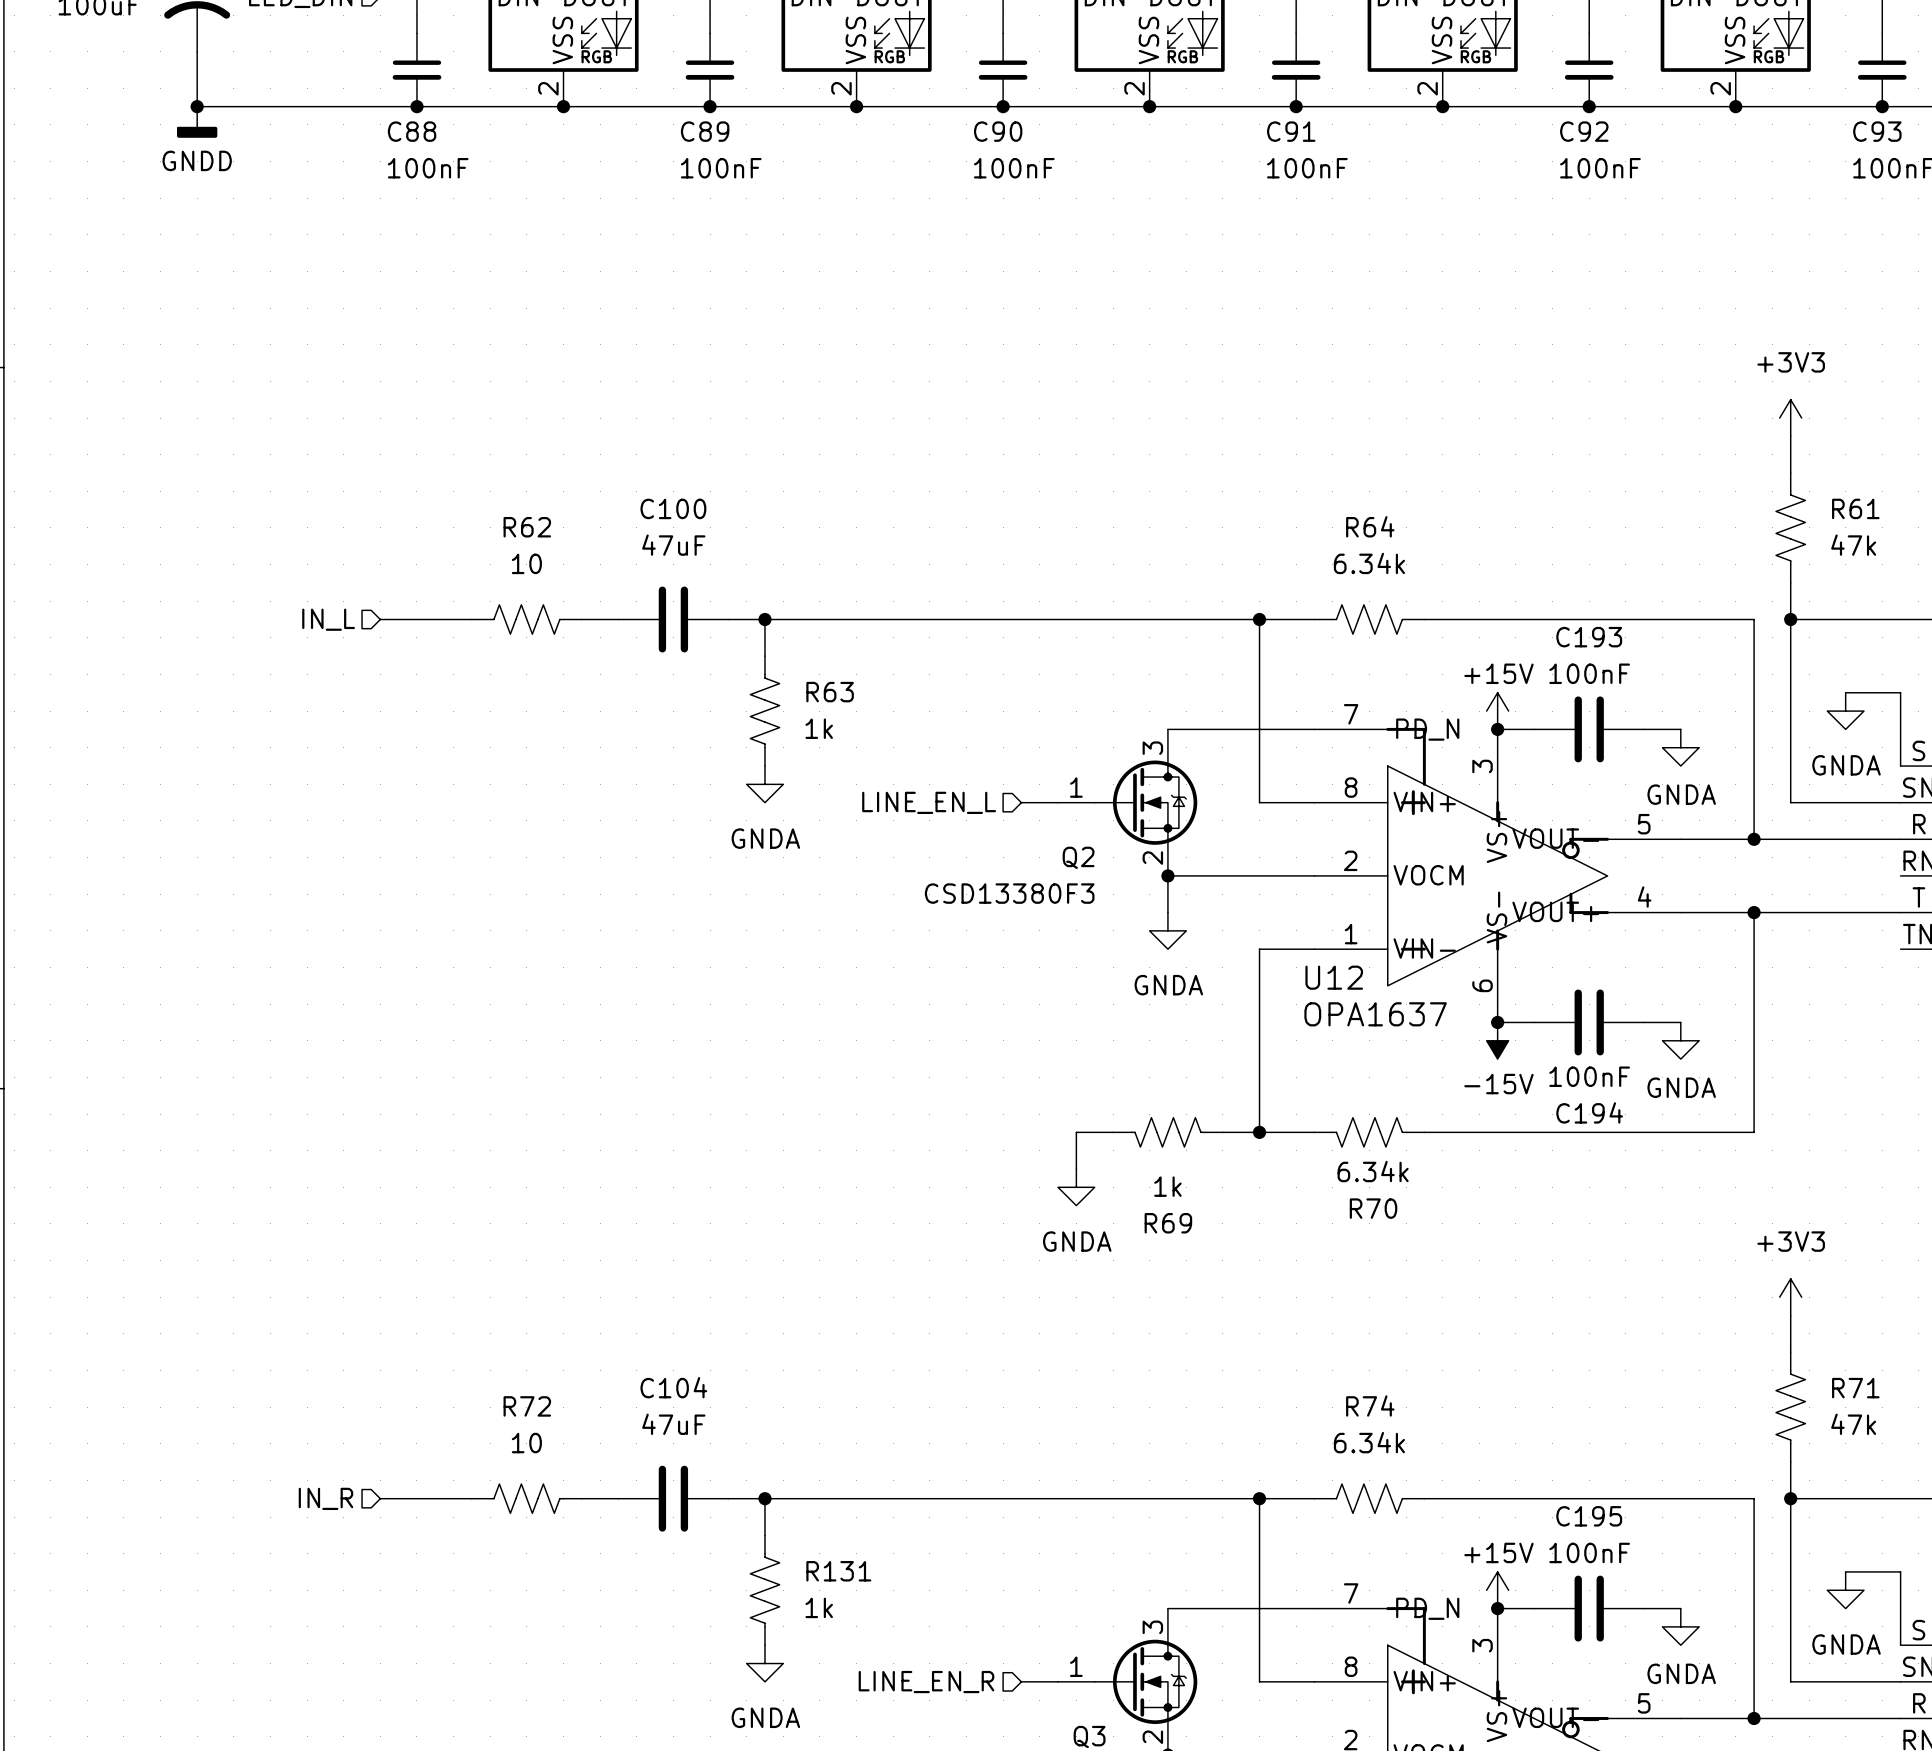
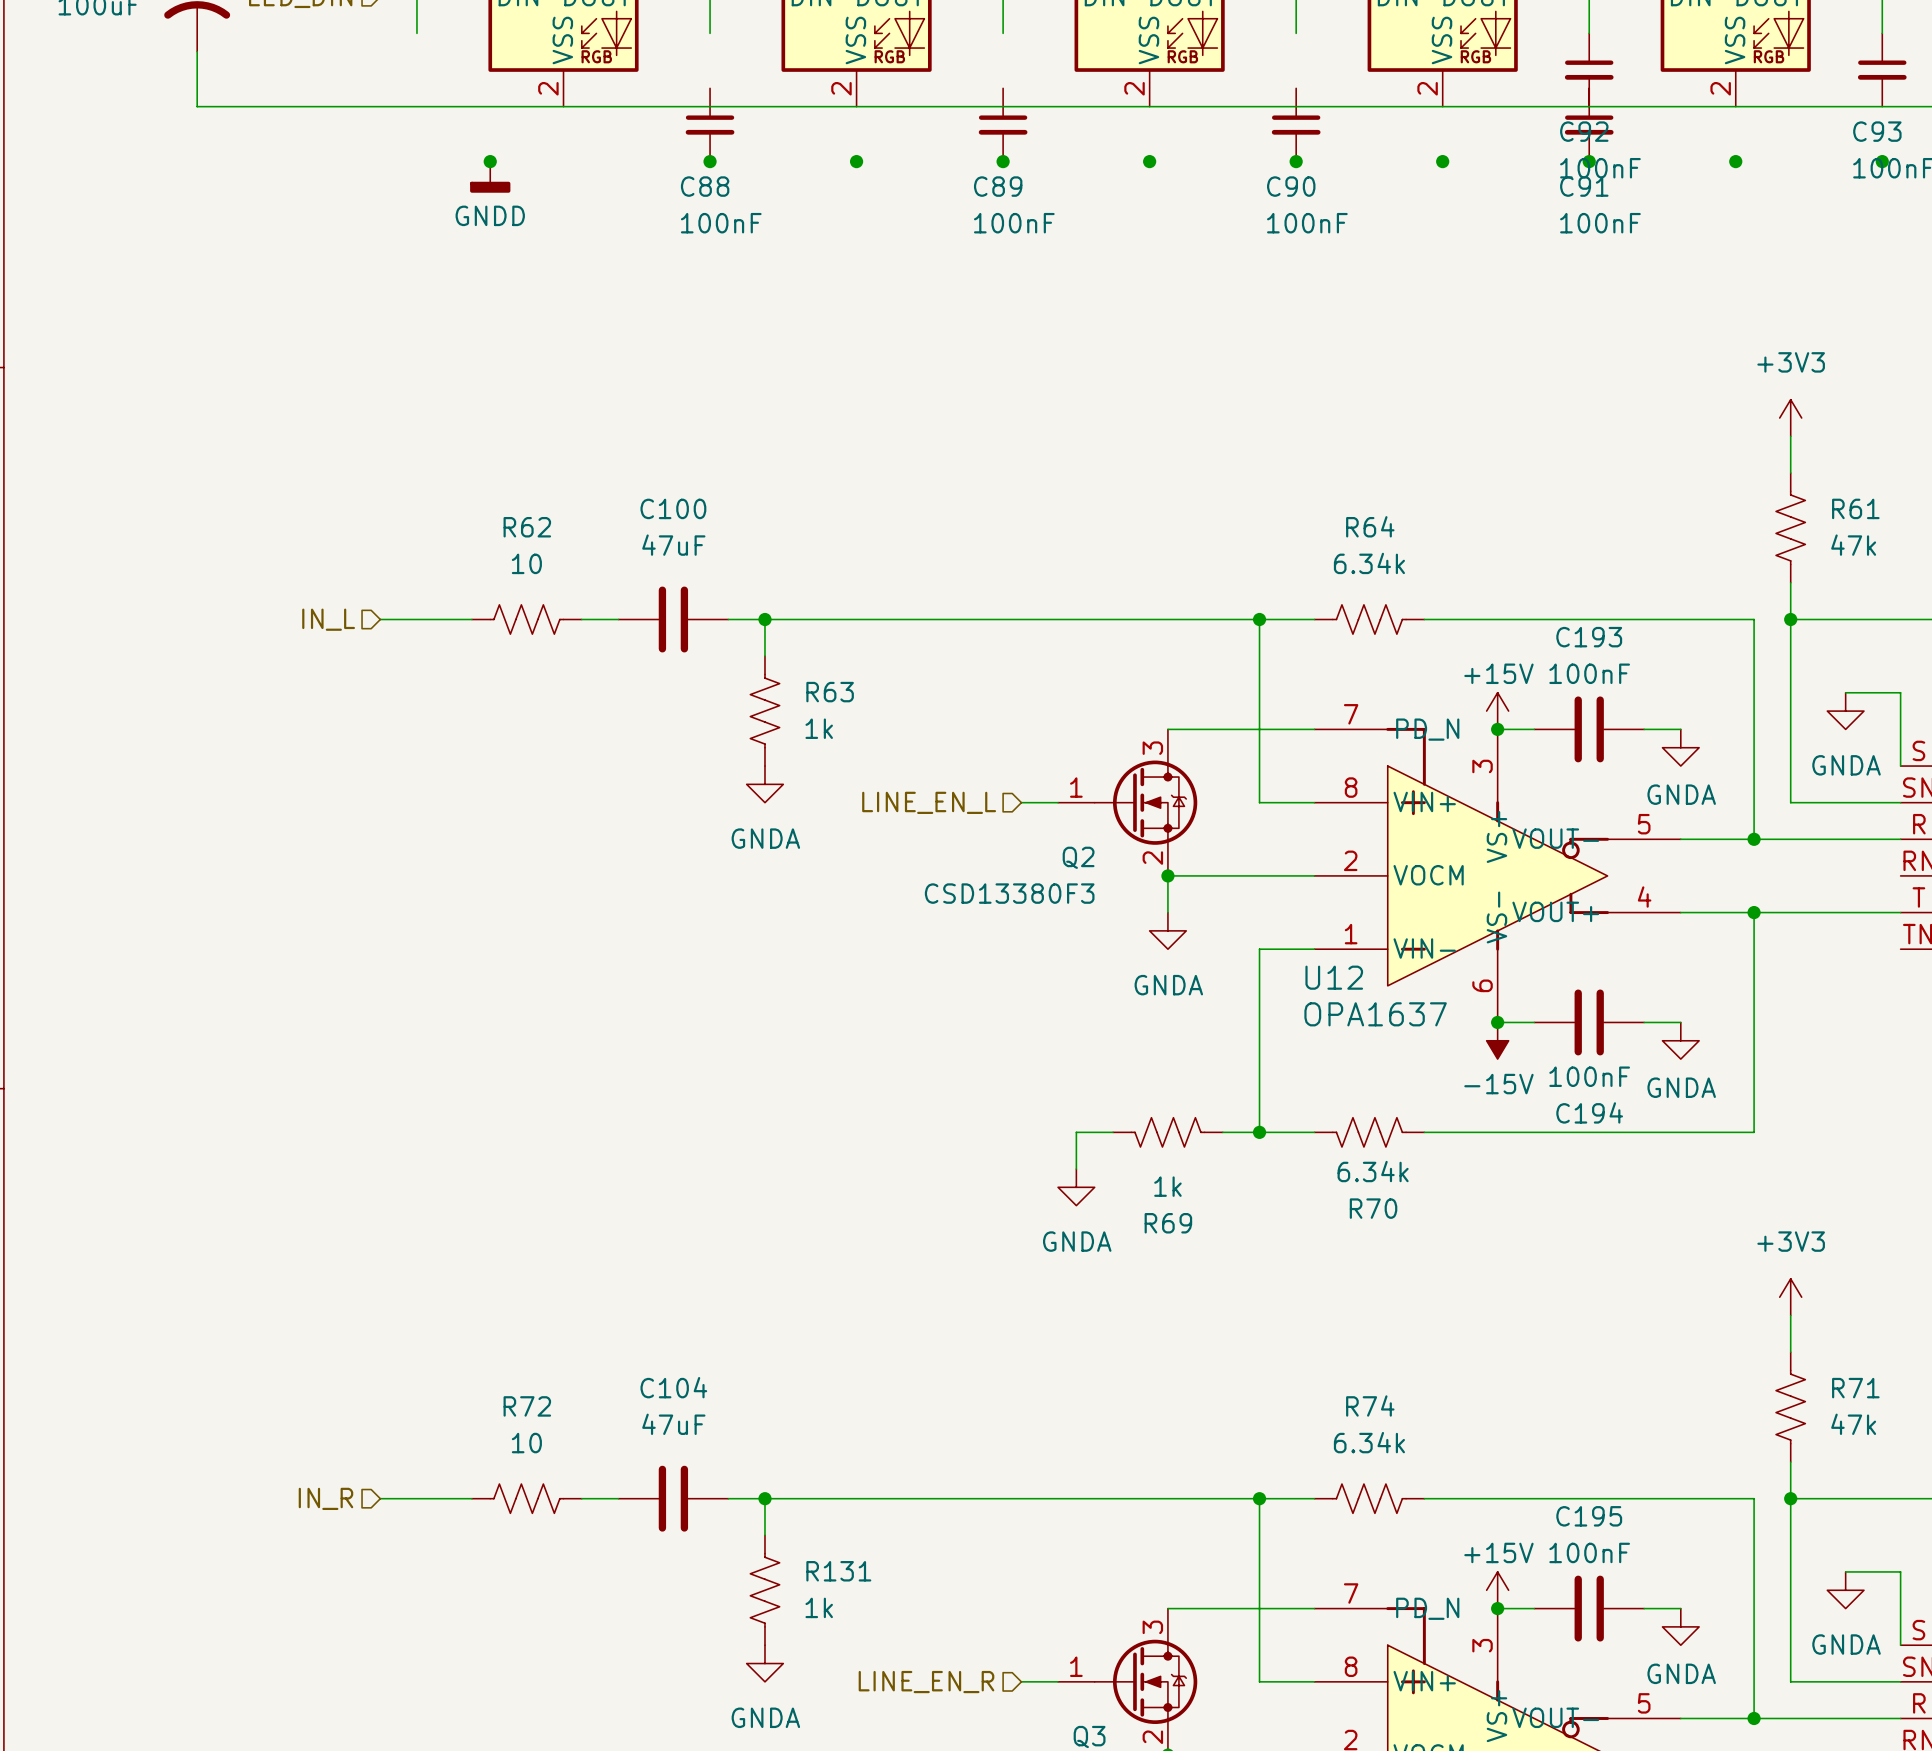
C88 position: (416, 70) -> (710, 124)
C89 position: (710, 70) -> (1003, 124)
C90 position: (1003, 70) -> (1296, 124)
C91 position: (1296, 70) -> (1589, 124)
junction: (197, 106) -> none
junction: (416, 106) -> none
junction: (563, 106) -> none
junction position: (710, 106) -> (710, 161)
junction position: (856, 106) -> (856, 161)
junction position: (1003, 106) -> (1003, 161)
junction position: (1149, 106) -> (1149, 161)
junction position: (1296, 106) -> (1296, 161)
junction position: (1442, 106) -> (1442, 161)
junction position: (1589, 106) -> (1589, 161)
junction position: (1735, 106) -> (1735, 161)
junction position: (1882, 106) -> (1882, 161)
power symbol position: GNDD (197, 122) -> GNDD (490, 177)
junction: none -> (490, 161)

